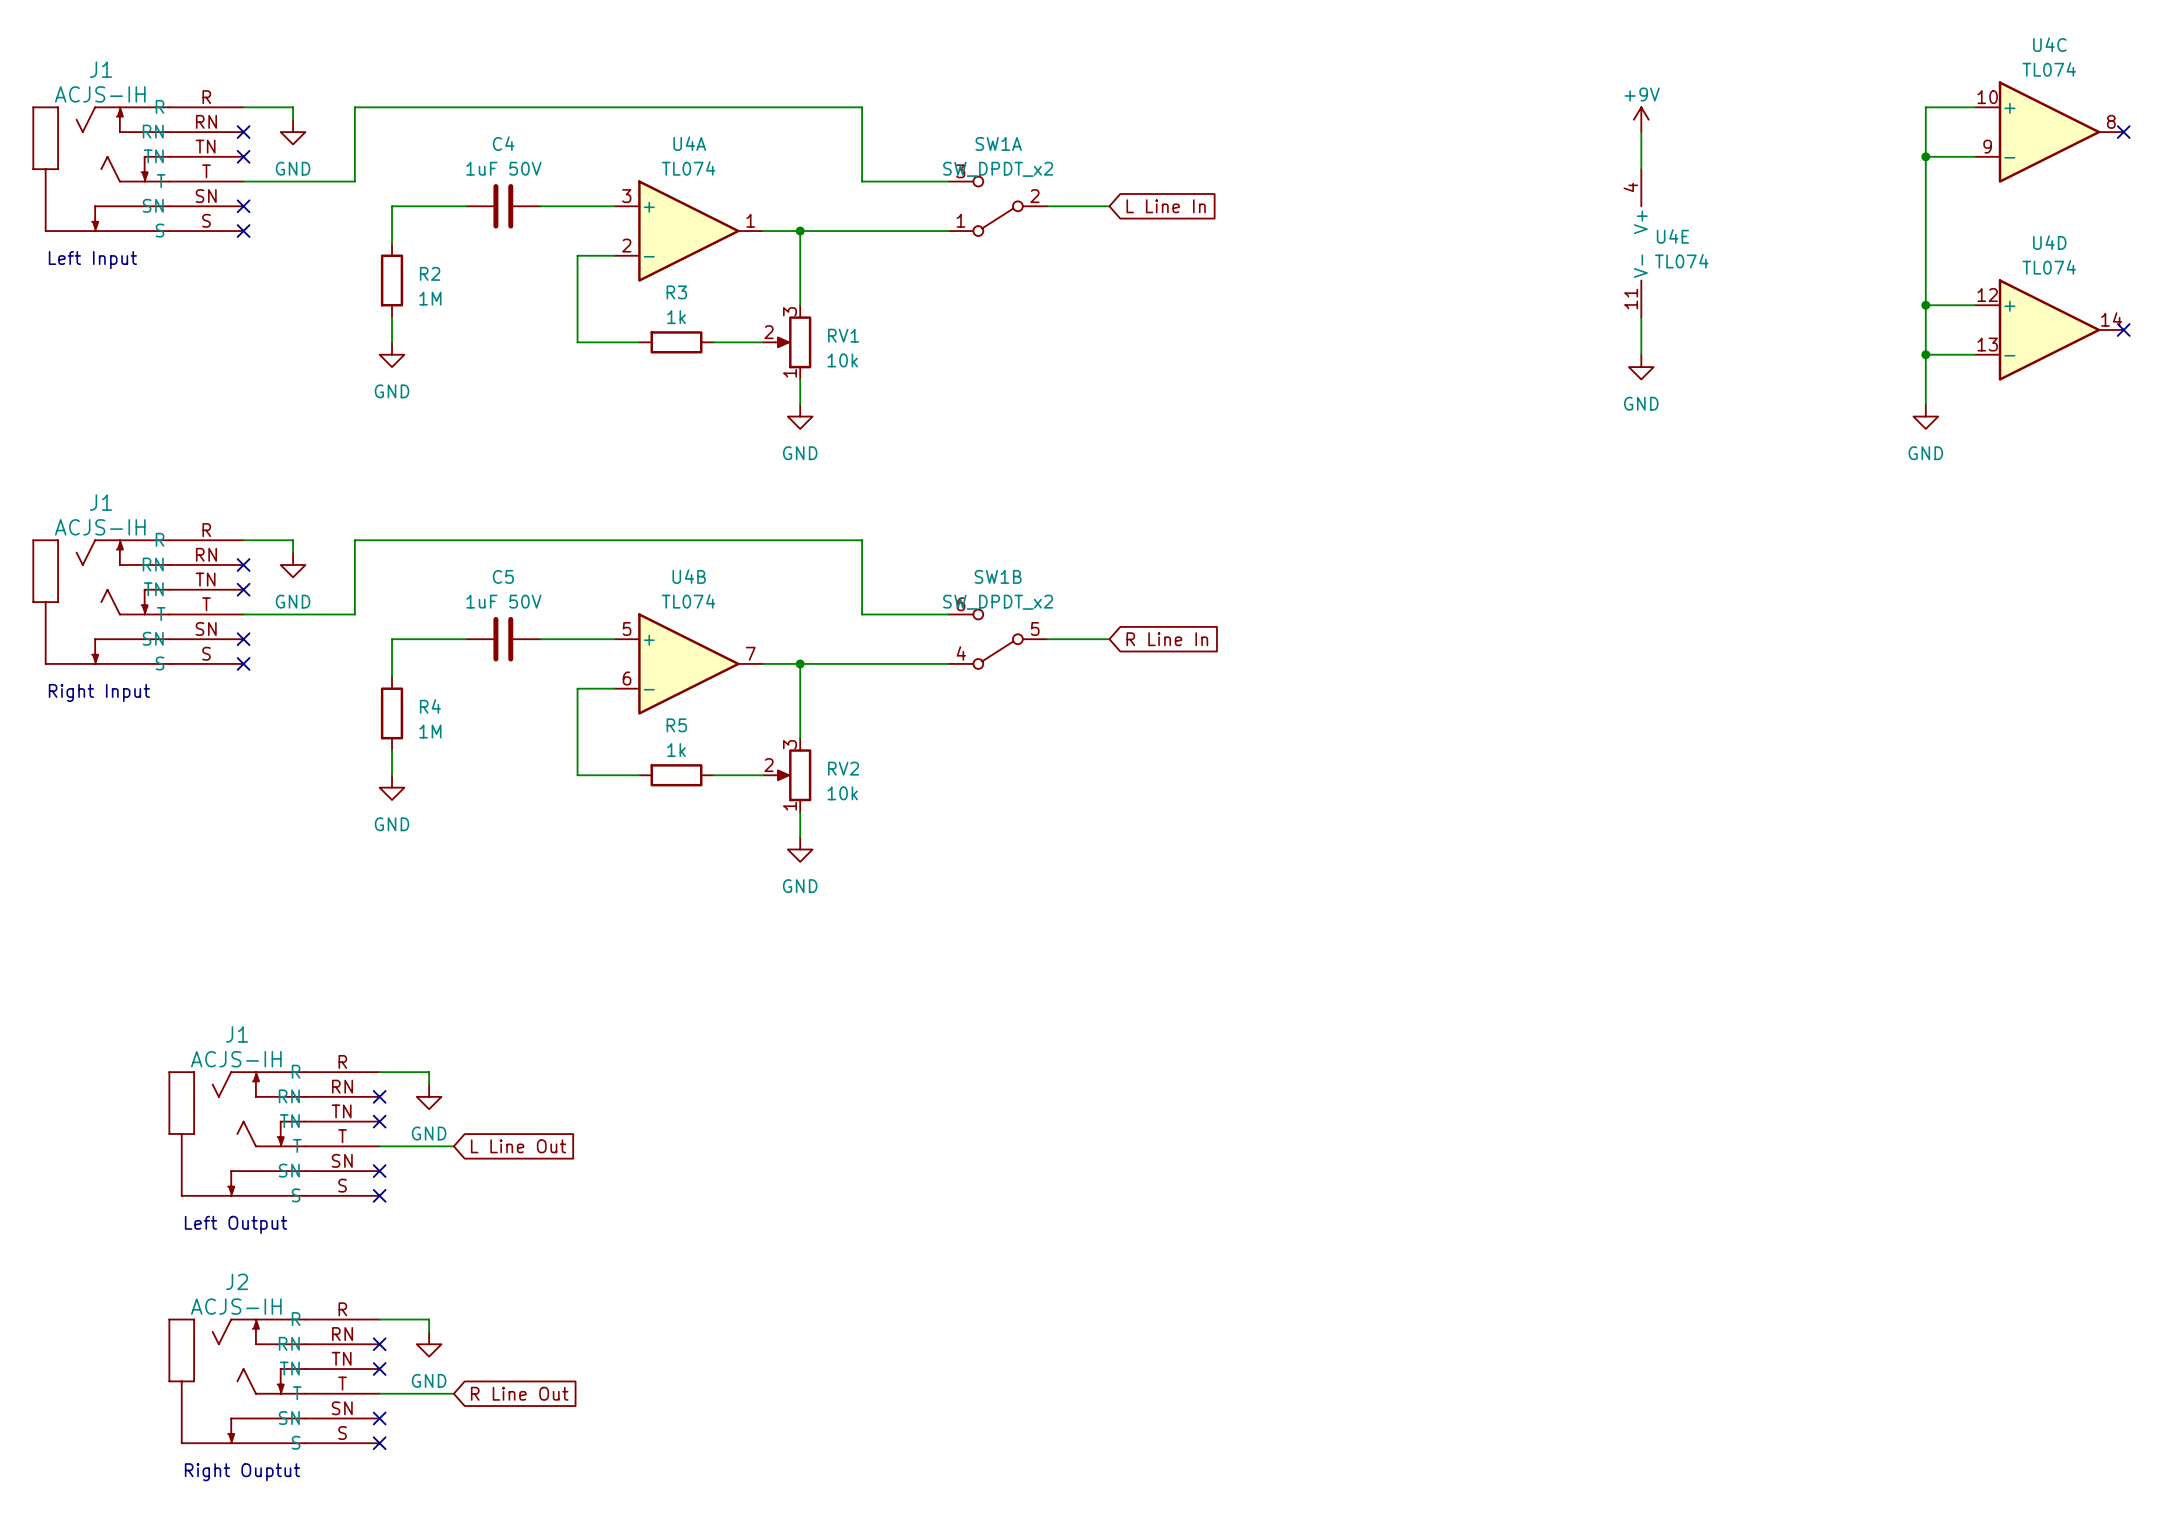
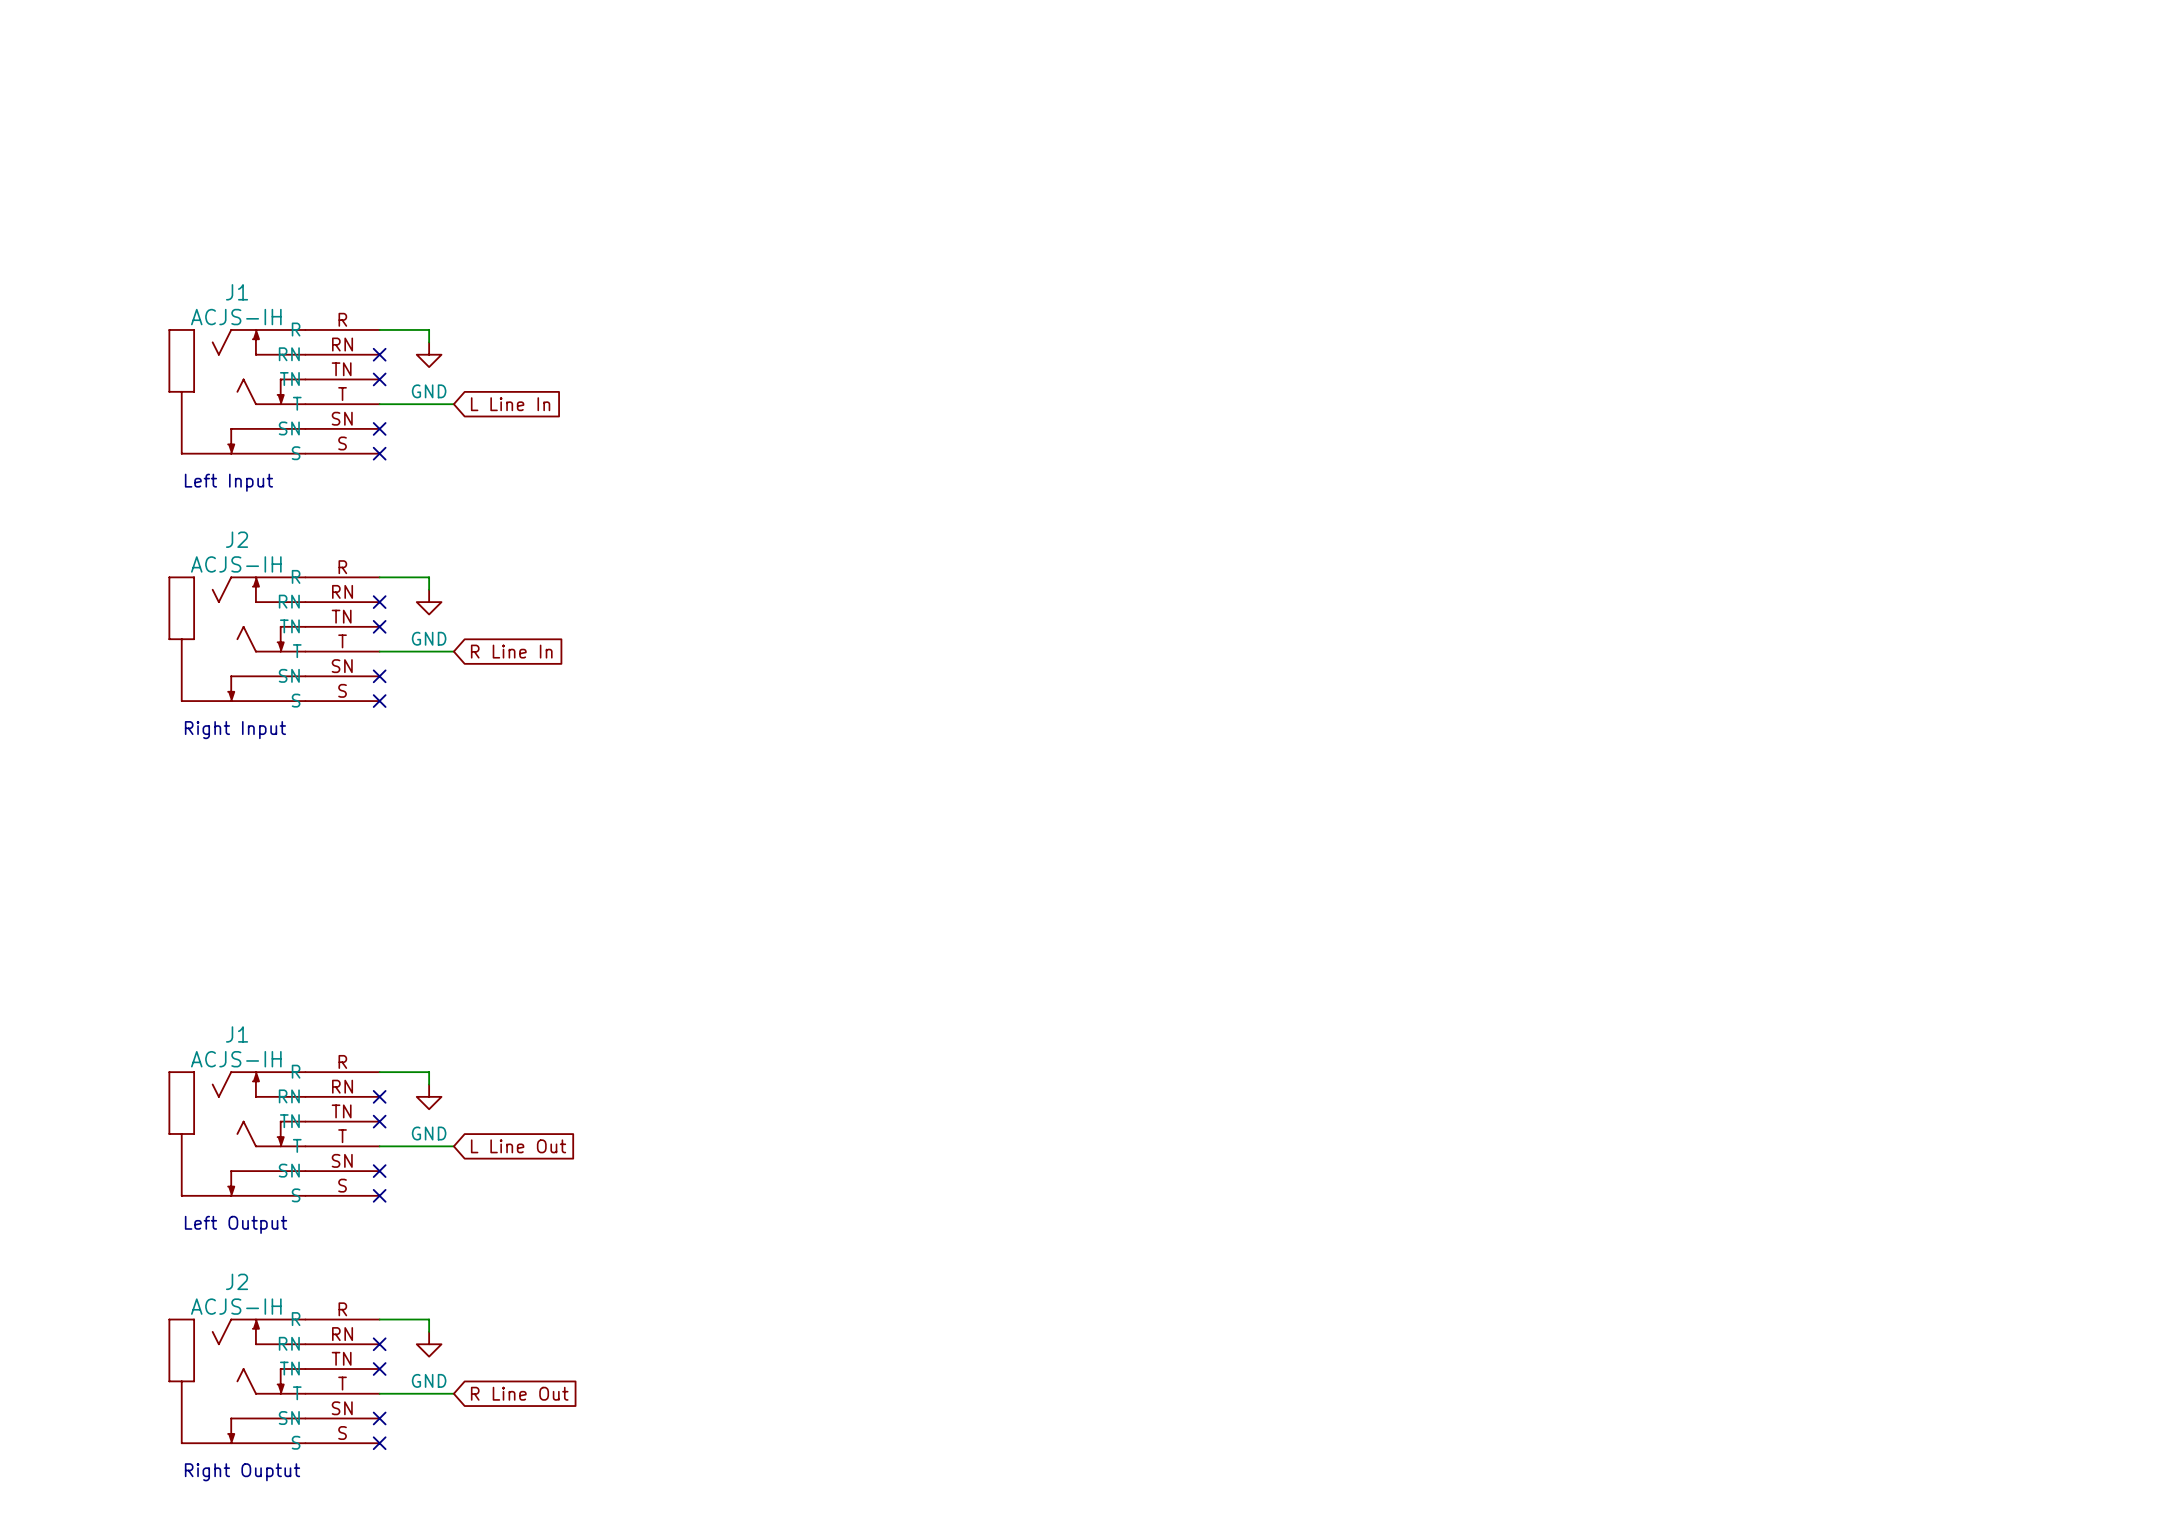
wire: (243, 107) (293, 107) (293, 119) -> none
wire: (1975, 107) (1925, 107) (1925, 404) -> none
power symbol: +9V (1641, 119) -> none
no-connect mark: (243, 132) -> none
power symbol: GND (293, 132) -> none
wire: (1641, 132) (1641, 169) -> none
U4C: TL074 (2049, 132) -> none
no-connect mark: (2123, 132) -> none
no-connect mark: (243, 156) -> none
wire: (1925, 156) (1975, 156) -> none
junction: (1925, 156) -> none
J1: ACJS-IH (138, 169) -> none
wire: (243, 181) (354, 181) (354, 107) (862, 107) (862, 181) (948, 181) -> none
no-connect mark: (243, 206) -> none
wire: (466, 206) (392, 206) (392, 243) -> none
C4: 1uF 50V (503, 206) -> none
wire: (540, 206) (614, 206) -> none
SW1A: SW_DPDT_x2 (998, 206) -> none
wire: (1047, 206) (1109, 206) -> none
global label: L Line In (1166, 206) -> none
no-connect mark: (243, 231) -> none
U4A: TL074 (688, 231) -> none
wire: (763, 231) (948, 231) -> none
wire: (800, 231) (800, 305) -> none
junction: (800, 231) -> none
U4E: TL074 (1641, 243) -> none
wire: (614, 255) (577, 255) (577, 342) (639, 342) -> none
text: Left Input (92, 260) -> none
R2: 1M (392, 280) -> none
wire: (1925, 305) (1975, 305) -> none
junction: (1925, 305) -> none
wire: (392, 317) (392, 342) -> none
wire: (1641, 317) (1641, 354) -> none
wire: none -> (379, 329) (429, 329) (429, 342)
U4D: TL074 (2049, 329) -> none
no-connect mark: (2123, 329) -> none
R3: 1k (676, 342) -> none
wire: (713, 342) (763, 342) -> none
RV1: 10k (787, 342) -> none
no-connect mark: none -> (379, 354)
power symbol position: GND (392, 354) -> GND (429, 354)
wire: (1925, 354) (1975, 354) -> none
junction: (1925, 354) -> none
power symbol: GND (1641, 367) -> none
no-connect mark: none -> (379, 379)
wire: (800, 379) (800, 404) -> none
J1: none -> ACJS-IH (274, 391)
wire: none -> (379, 404) (453, 404)
global label: none -> L Line In (510, 404)
power symbol: GND (800, 416) -> none
power symbol: GND (1925, 416) -> none
no-connect mark: none -> (379, 428)
no-connect mark: none -> (379, 453)
text: none -> Left Input (228, 482)
wire: (243, 540) (293, 540) (293, 552) -> (379, 577) (429, 577) (429, 589)
no-connect mark: (243, 565) -> none
power symbol: GND (293, 565) -> none
no-connect mark: (243, 589) -> none
J1: ACJS-IH (138, 602) -> none
no-connect mark: none -> (379, 602)
power symbol: none -> GND (429, 602)
wire: (243, 614) (354, 614) (354, 540) (862, 540) (862, 614) (948, 614) -> none
no-connect mark: none -> (379, 626)
no-connect mark: (243, 639) -> none
J2: none -> ACJS-IH (274, 639)
wire: (466, 639) (392, 639) (392, 676) -> none
C5: 1uF 50V (503, 639) -> none
wire: (540, 639) (614, 639) -> (379, 651) (453, 651)
SW1B: SW_DPDT_x2 (998, 639) -> none
wire: (1047, 639) (1109, 639) -> none
global label: R Line In (1167, 639) -> none
global label: none -> R Line In (511, 651)
no-connect mark: (243, 663) -> none
U4B: TL074 (688, 663) -> none
wire: (763, 663) (948, 663) -> none
wire: (800, 663) (800, 738) -> none
junction: (800, 663) -> none
no-connect mark: none -> (379, 676)
wire: (614, 688) (577, 688) (577, 775) (639, 775) -> none
text position: Right Input (99, 692) -> Right Input (235, 730)
no-connect mark: none -> (379, 701)
R4: 1M (392, 713) -> none
wire: (392, 750) (392, 775) -> none
R5: 1k (676, 775) -> none
wire: (713, 775) (763, 775) -> none
RV2: 10k (787, 775) -> none
power symbol: GND (392, 787) -> none
wire: (800, 812) (800, 837) -> none
power symbol: GND (800, 849) -> none

